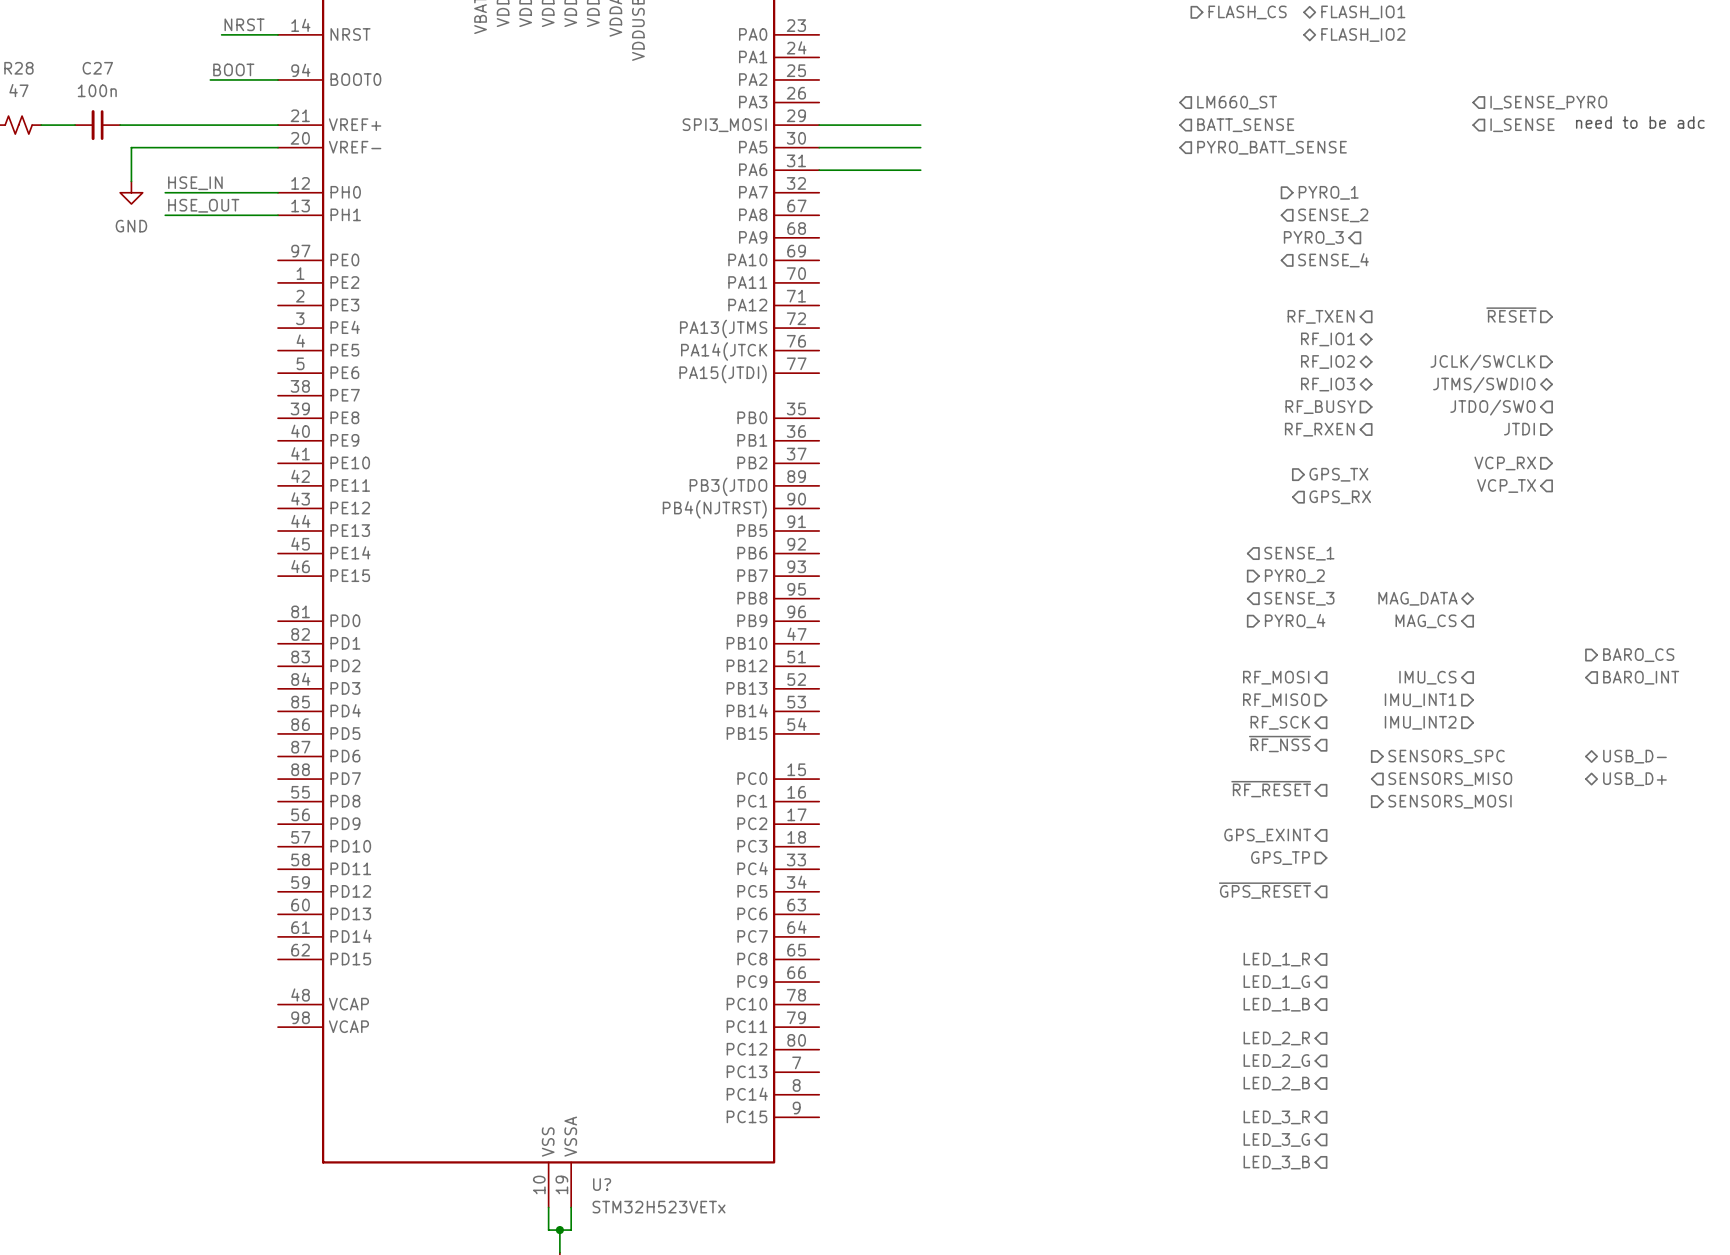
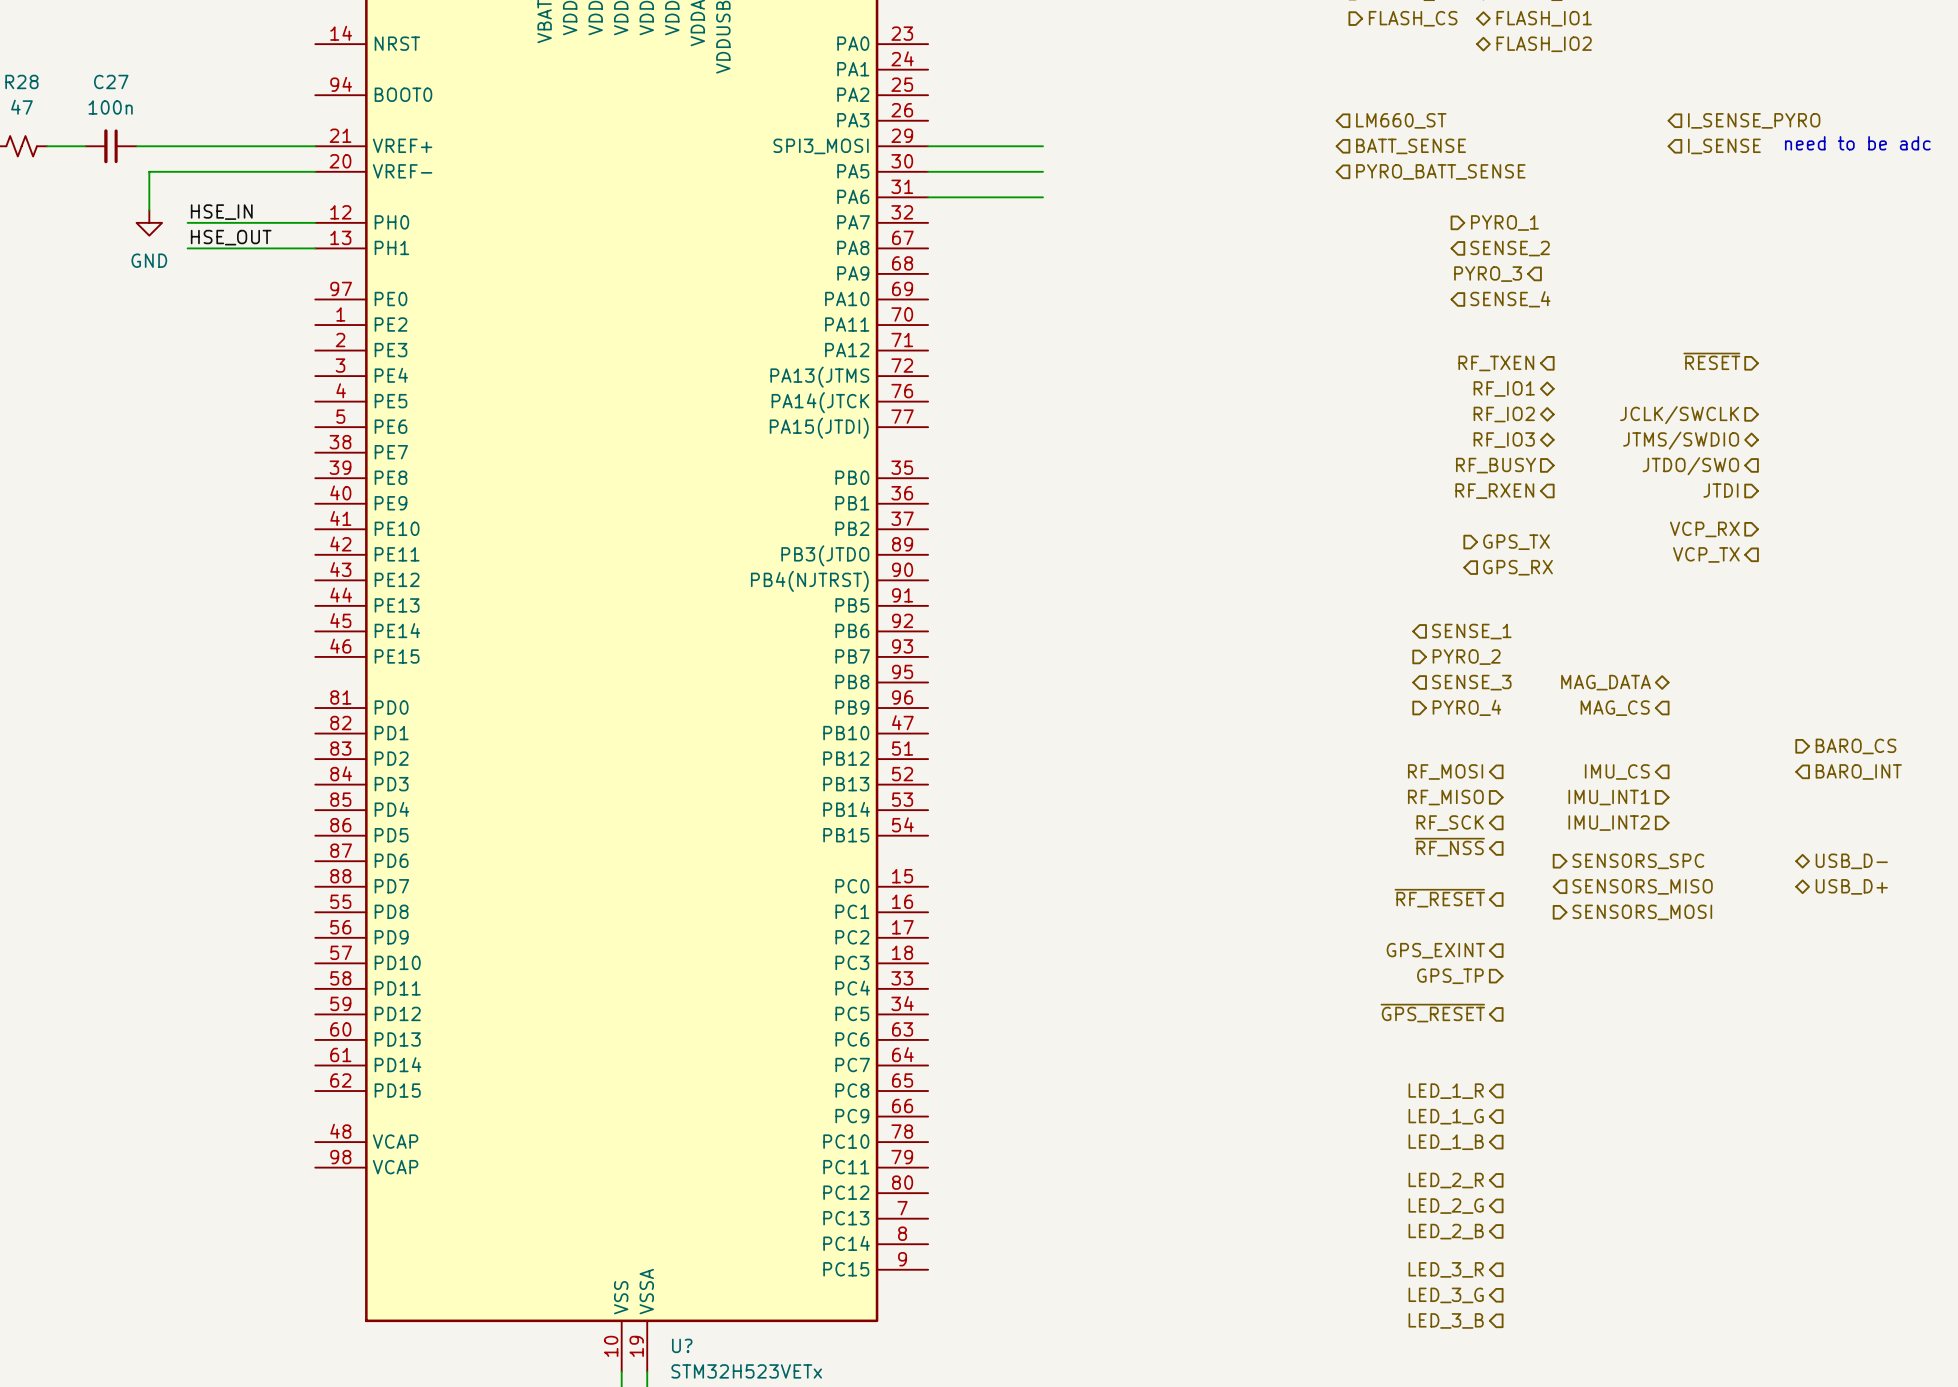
label: NRST (244, 24) -> none
wire: (221, 34) (278, 34) -> none
label: BOOT (233, 69) -> none
wire: (210, 79) (278, 79) -> none

